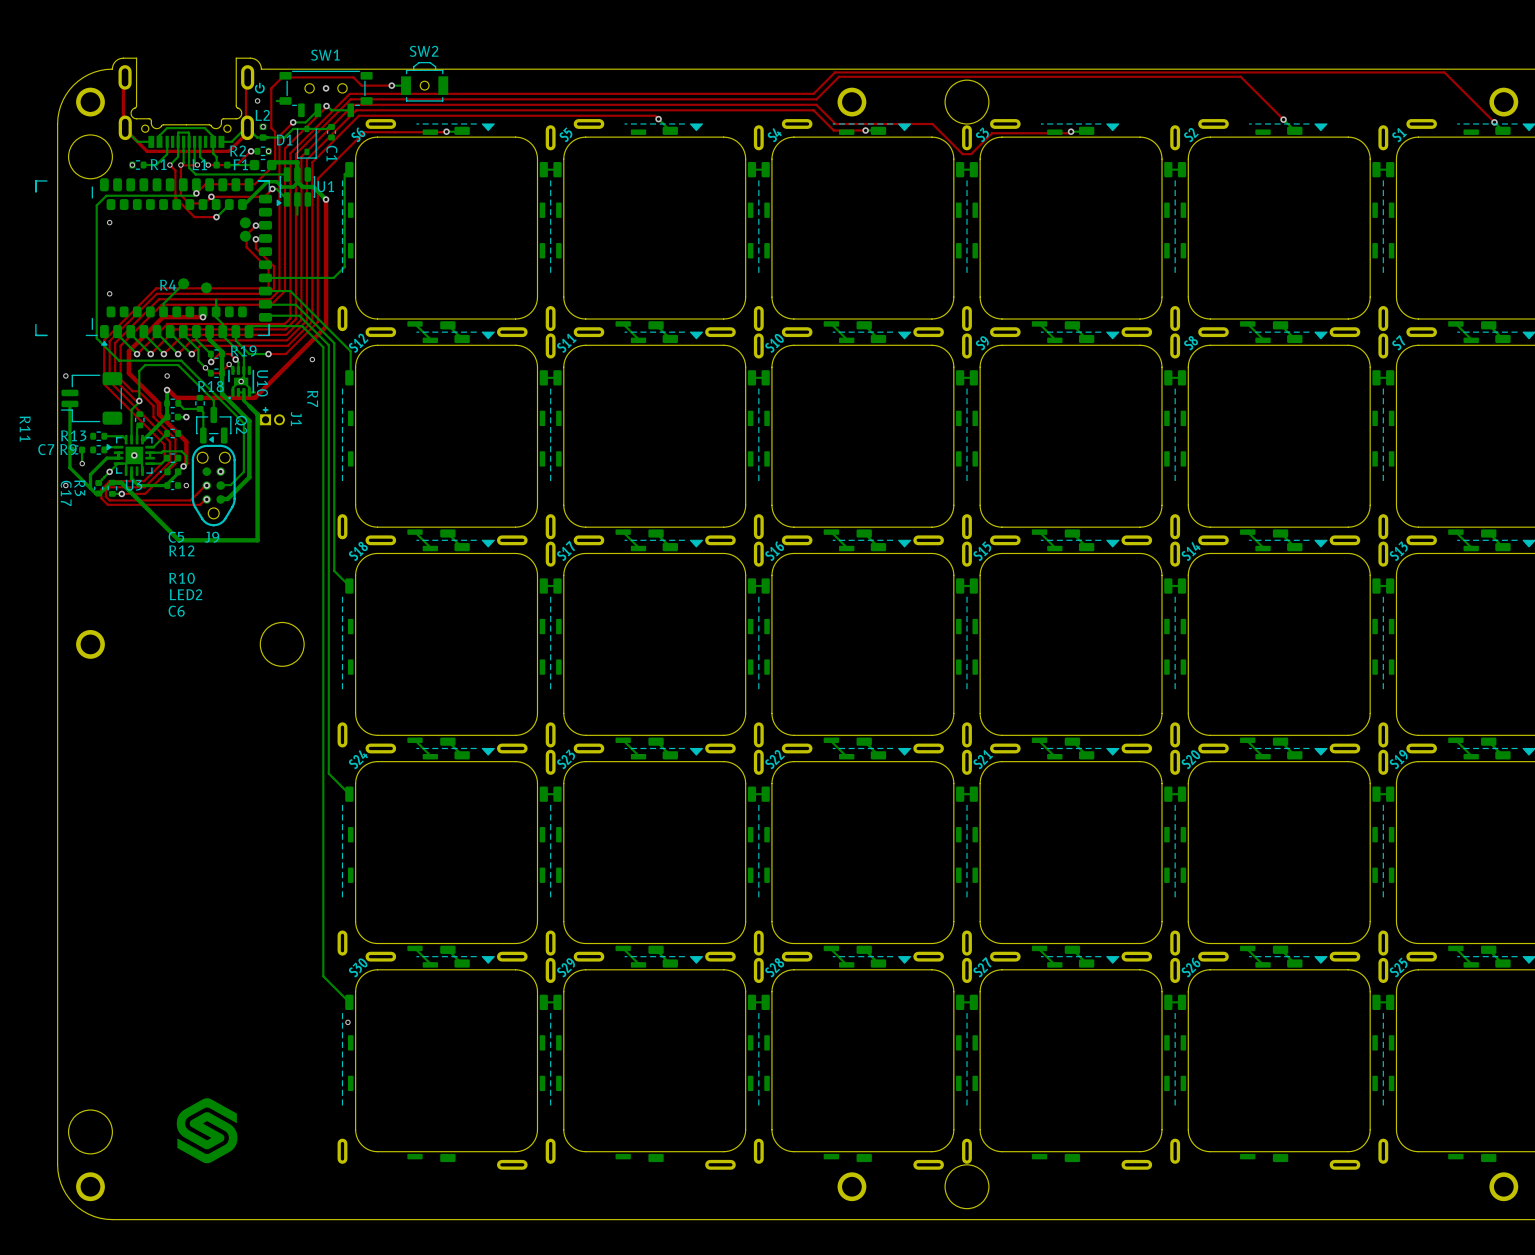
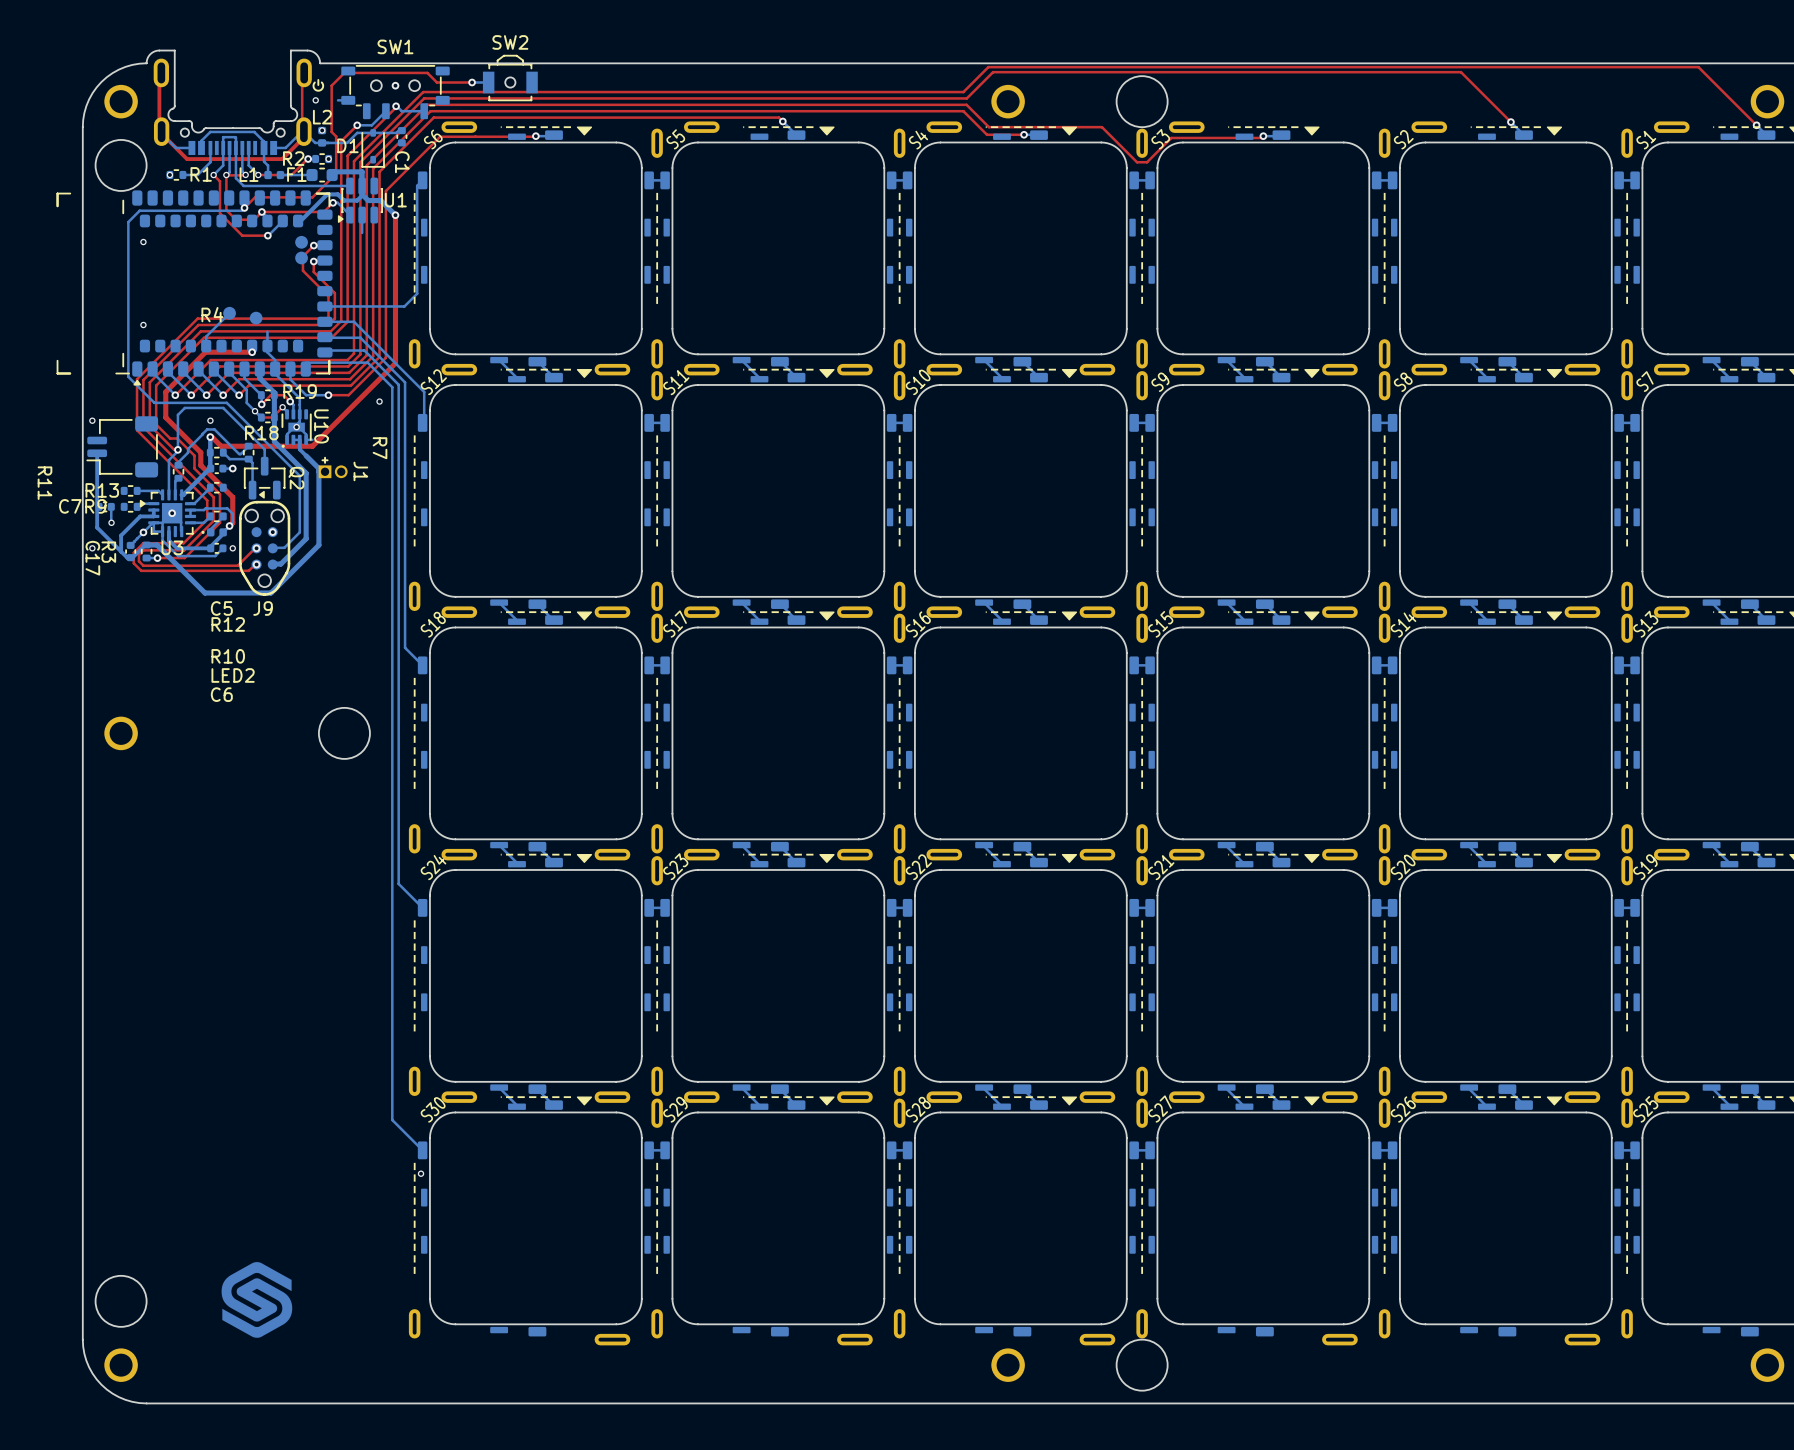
bottom track: none -> (248, 446) (239, 454) (214, 429) (207, 429) (188, 448) (188, 452) (178, 462) (178, 465)
bottom track: (257, 414) (257, 540) (178, 540) (162, 523) -> (315, 465) (318, 468) (318, 545) (271, 593) (204, 593)
bottom track: none -> (153, 522) (153, 531) (162, 531) (162, 540) (178, 556) (215, 556) (222, 548)

